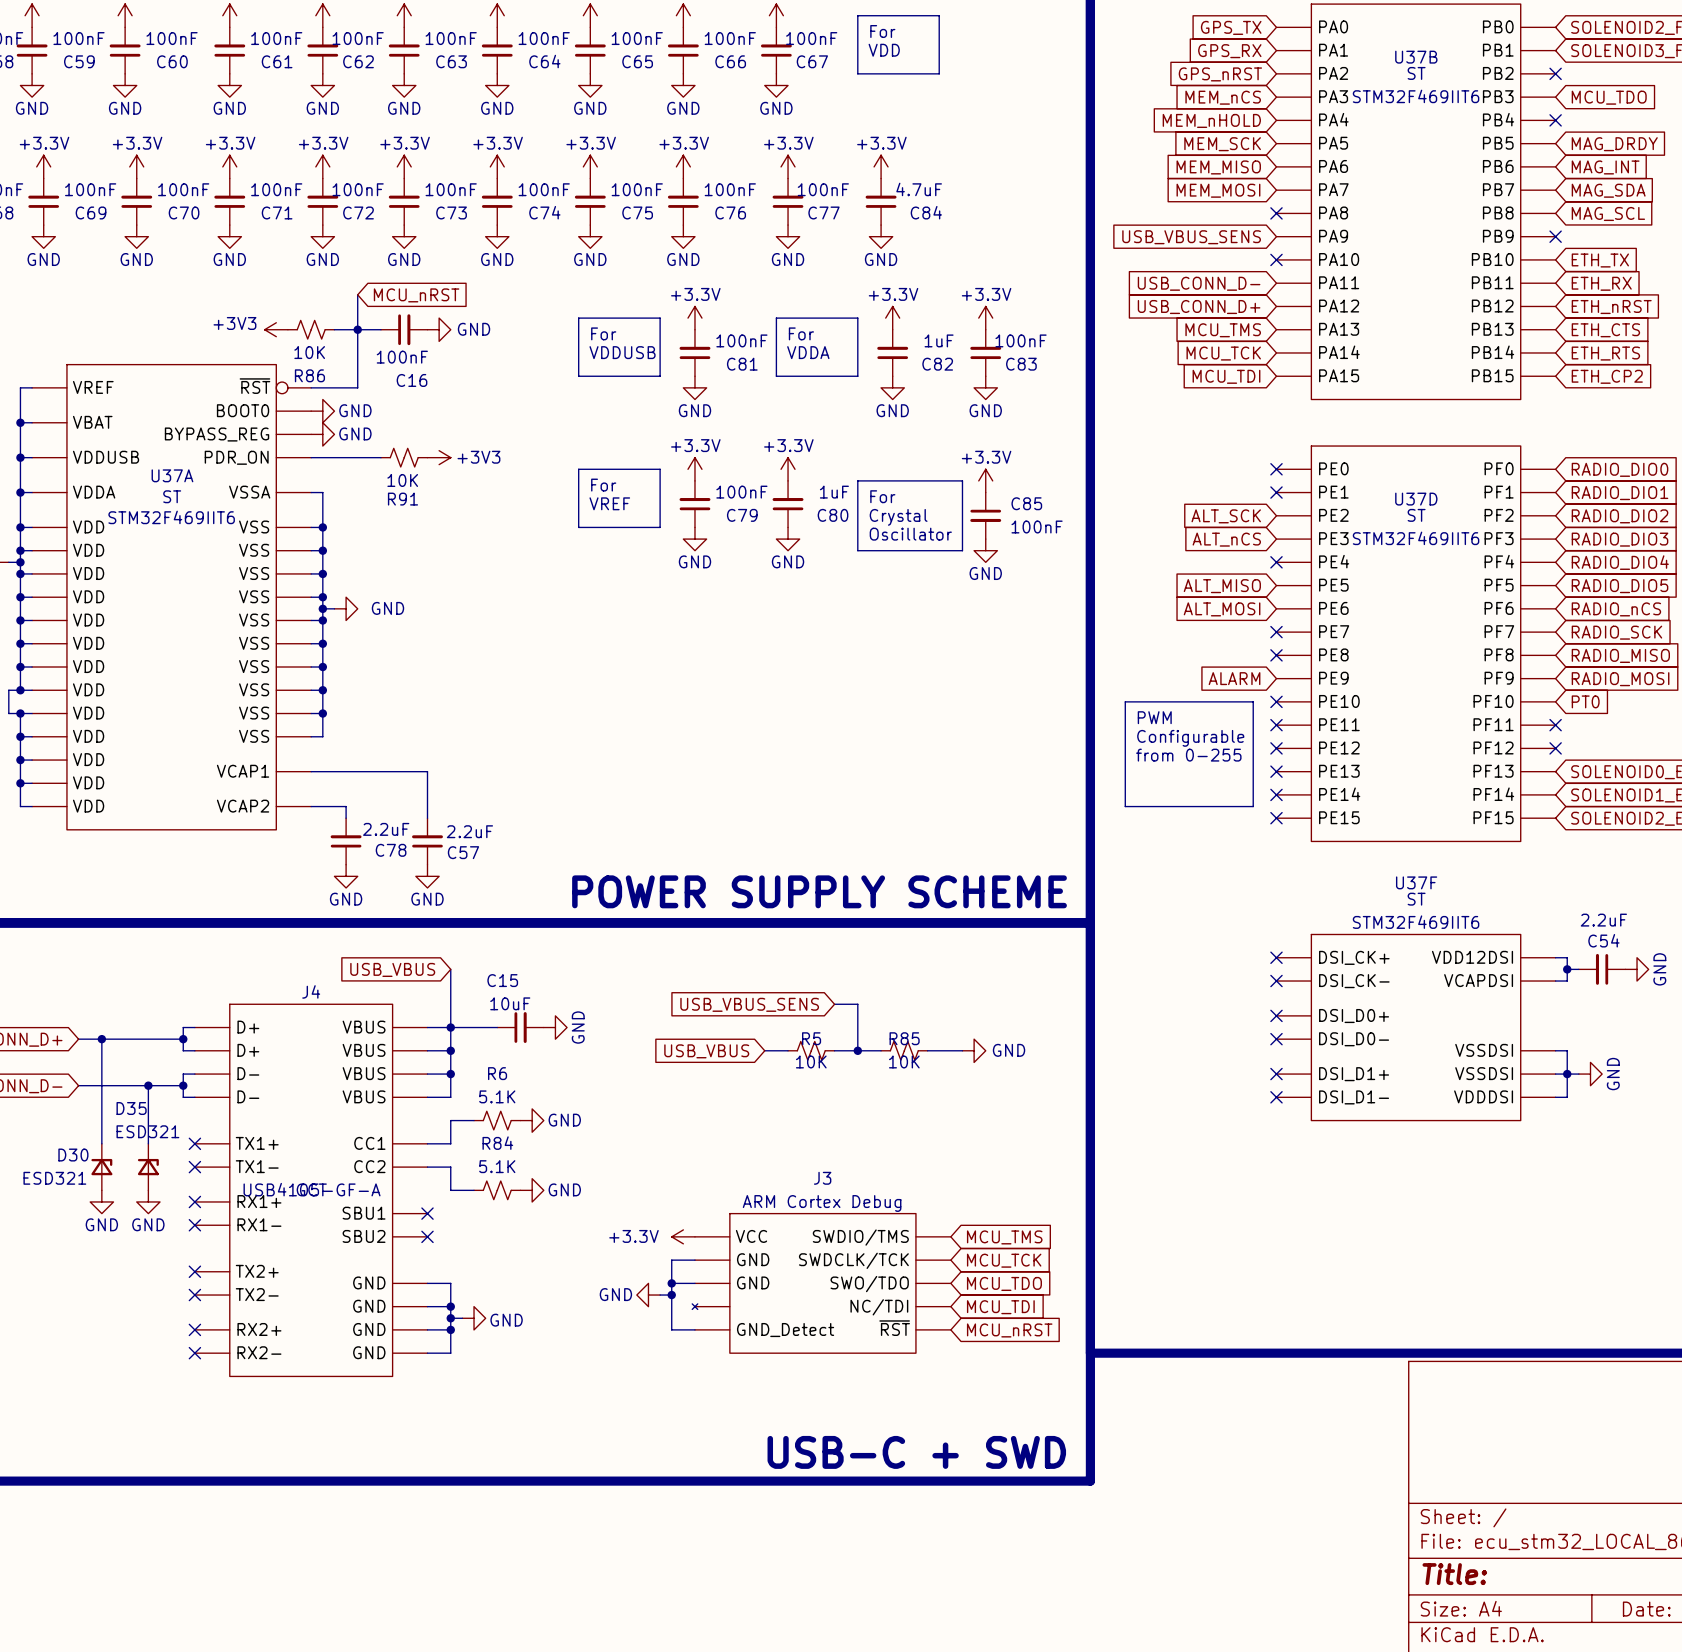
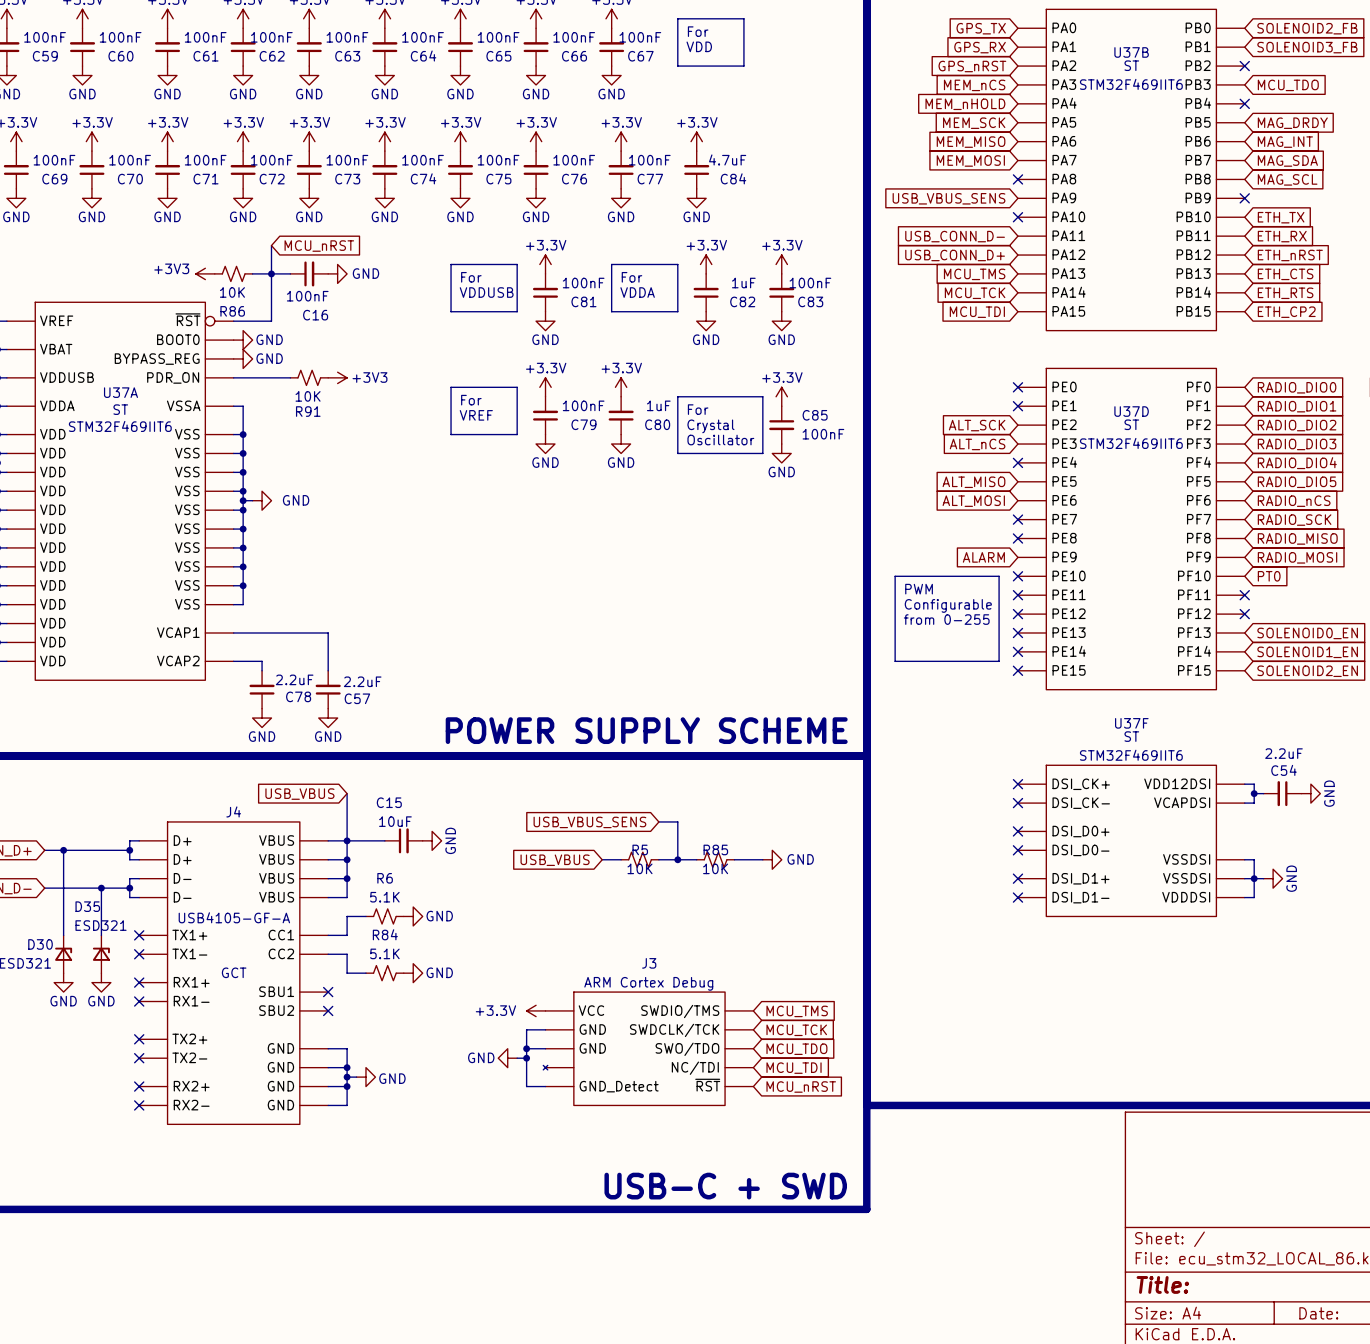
J4 text position: USB4105-GF-A (312, 1189) -> USB4105-GF-A (234, 917)

